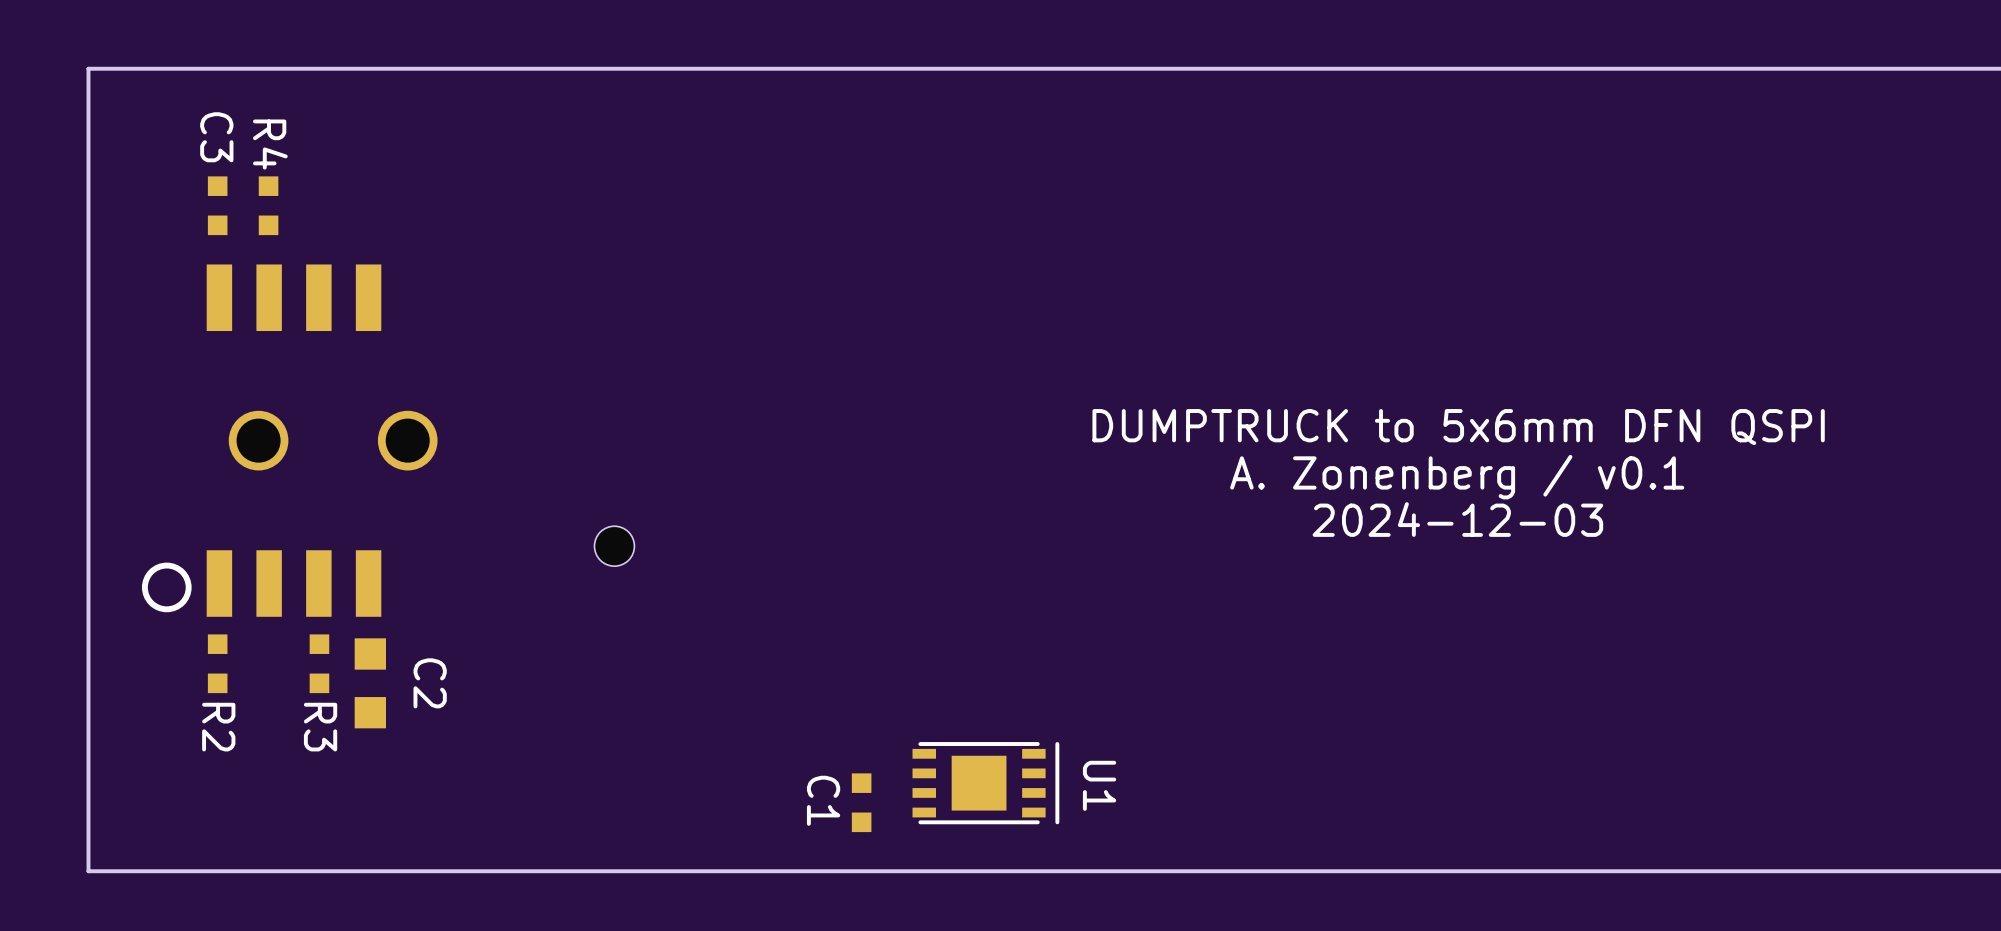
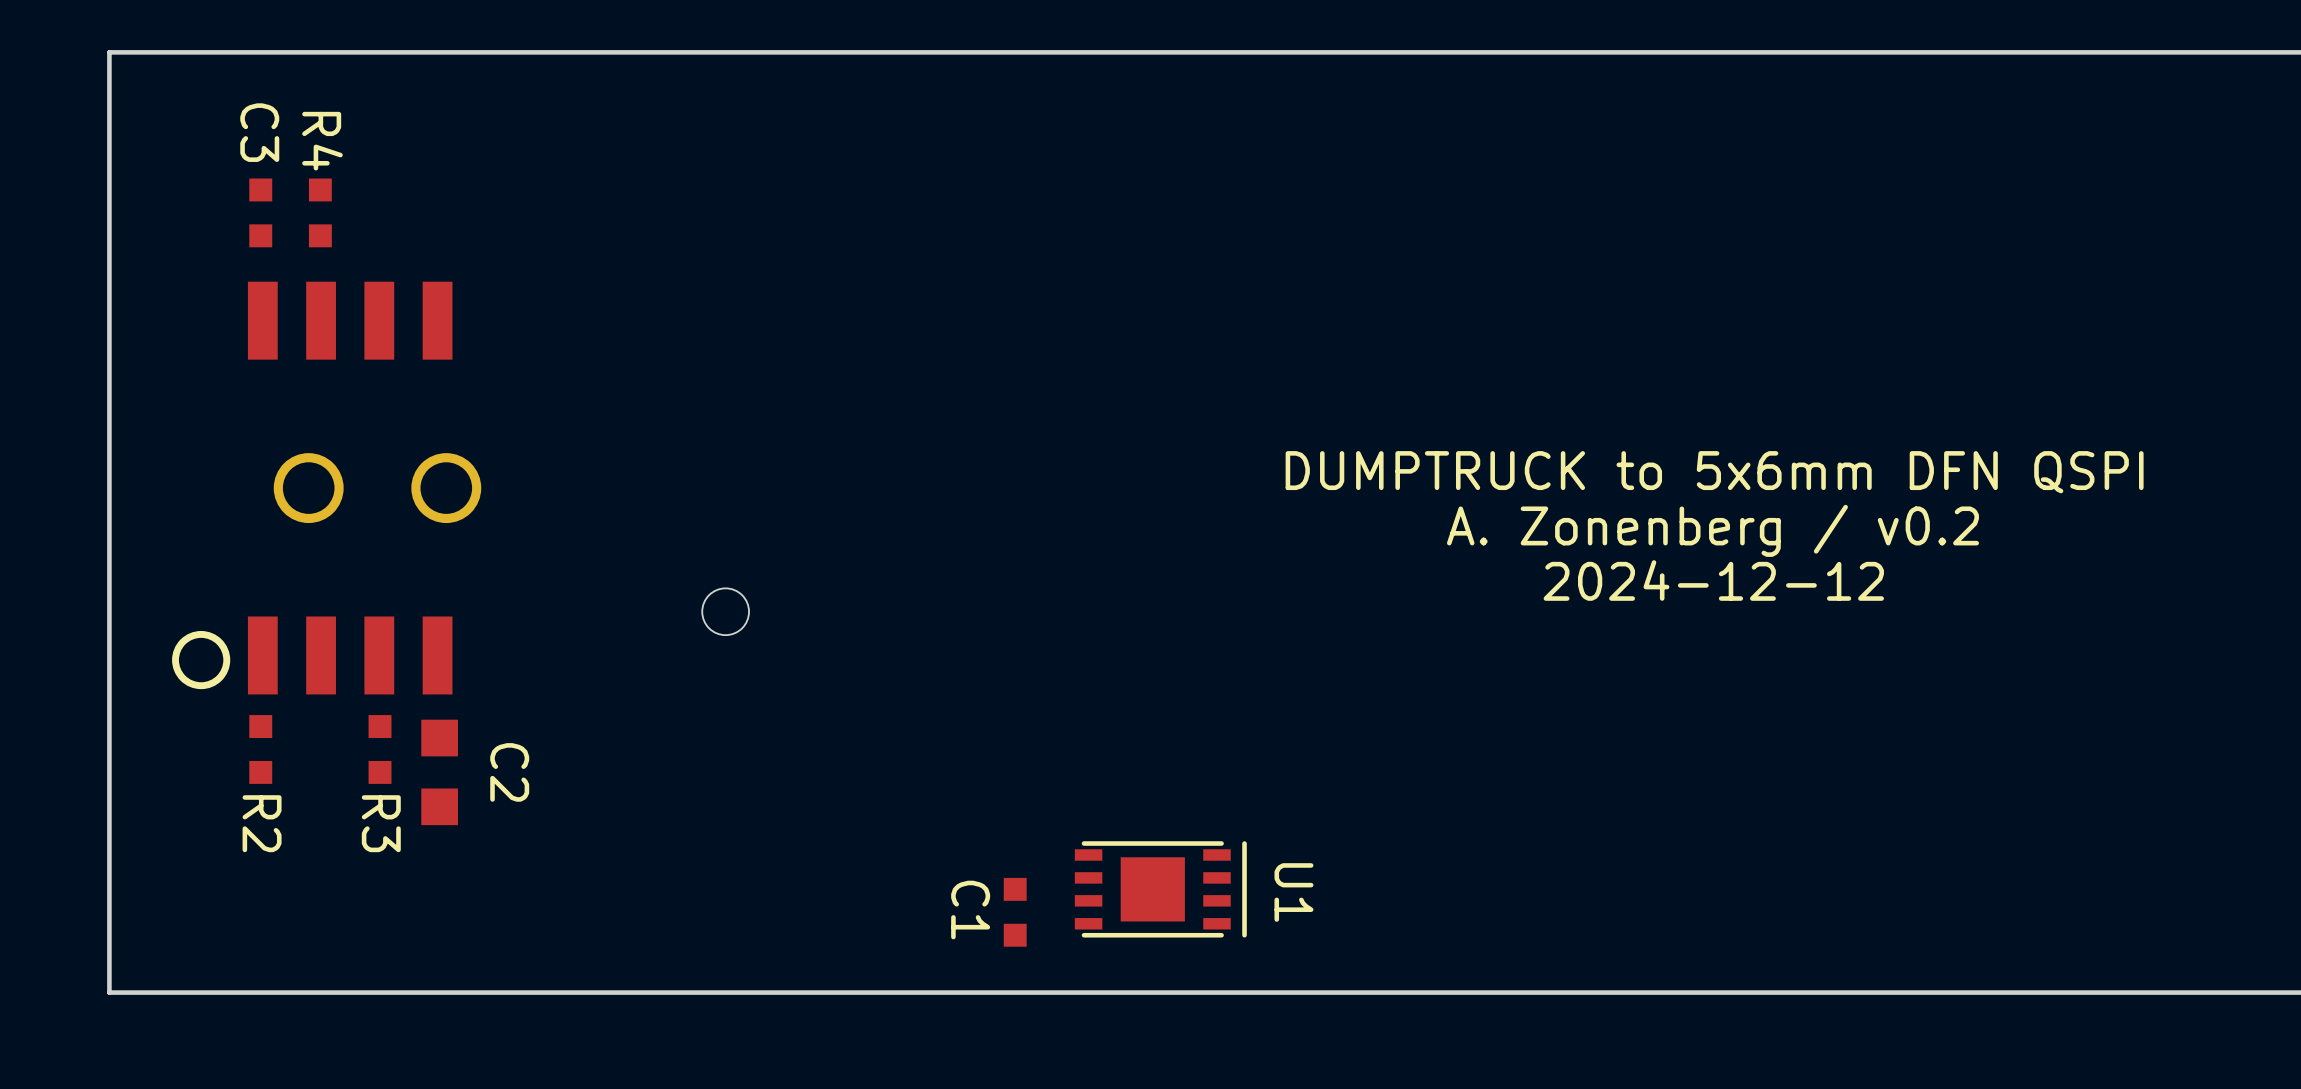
part footprint: [141, 264, 438, 617] -> [172, 281, 482, 695]
text: A. Zonenberg / v0.1 (1457, 477) -> A. Zonenberg / v0.2 (1712, 530)
text: 2024-12-03 (1457, 519) -> 2024-12-12 (1713, 580)

